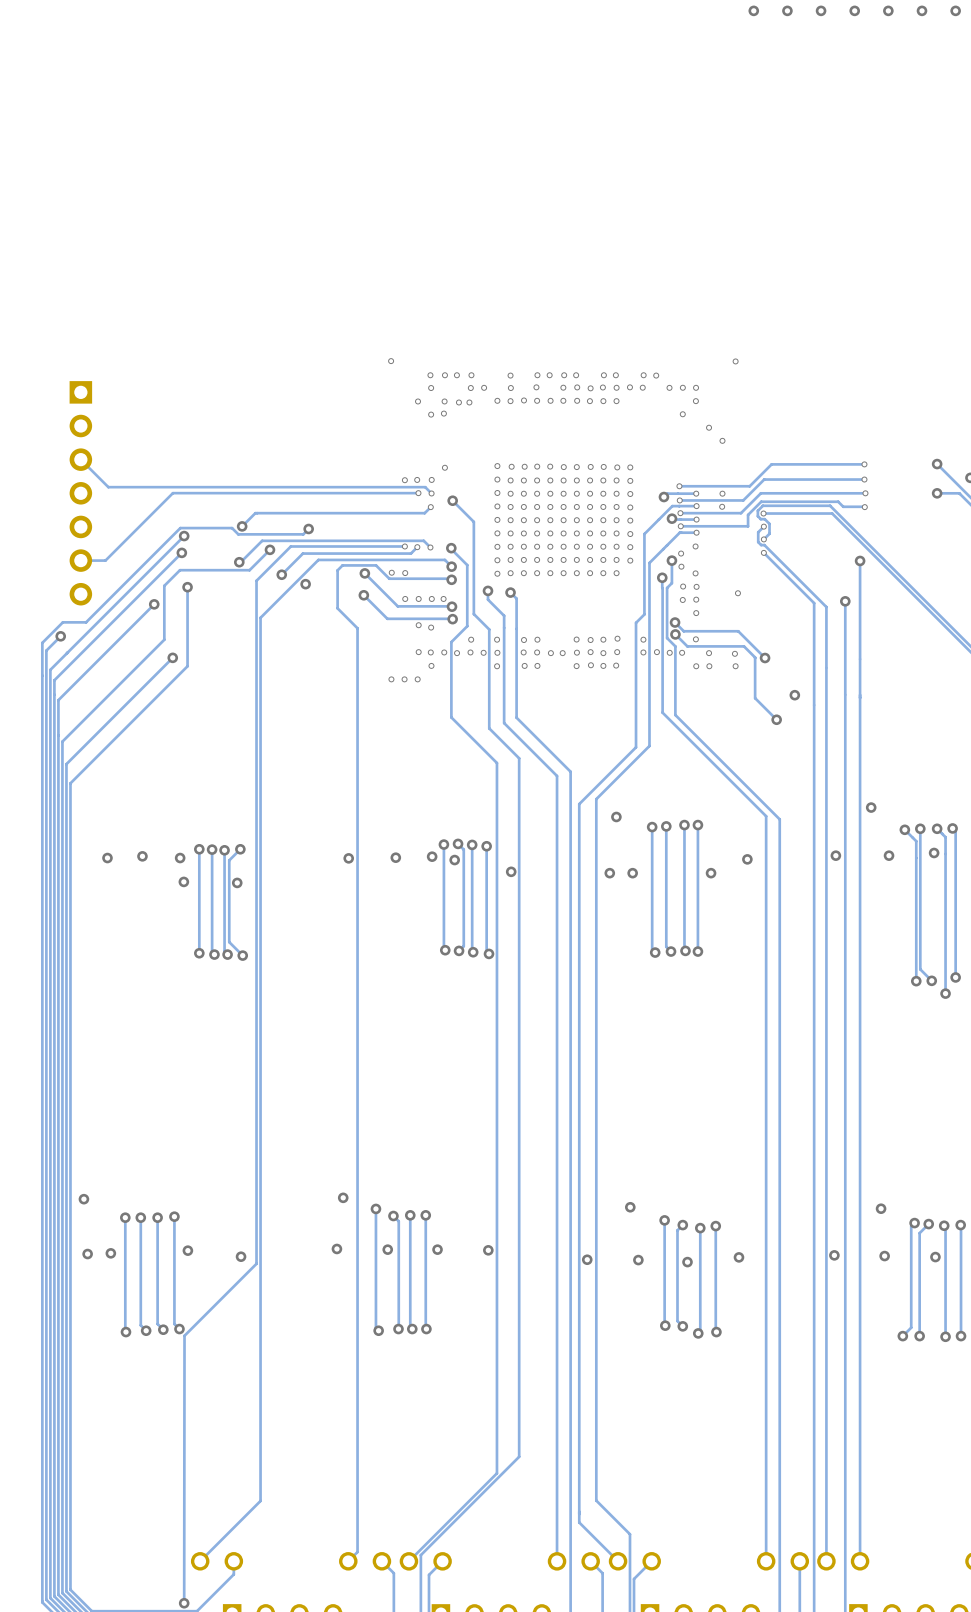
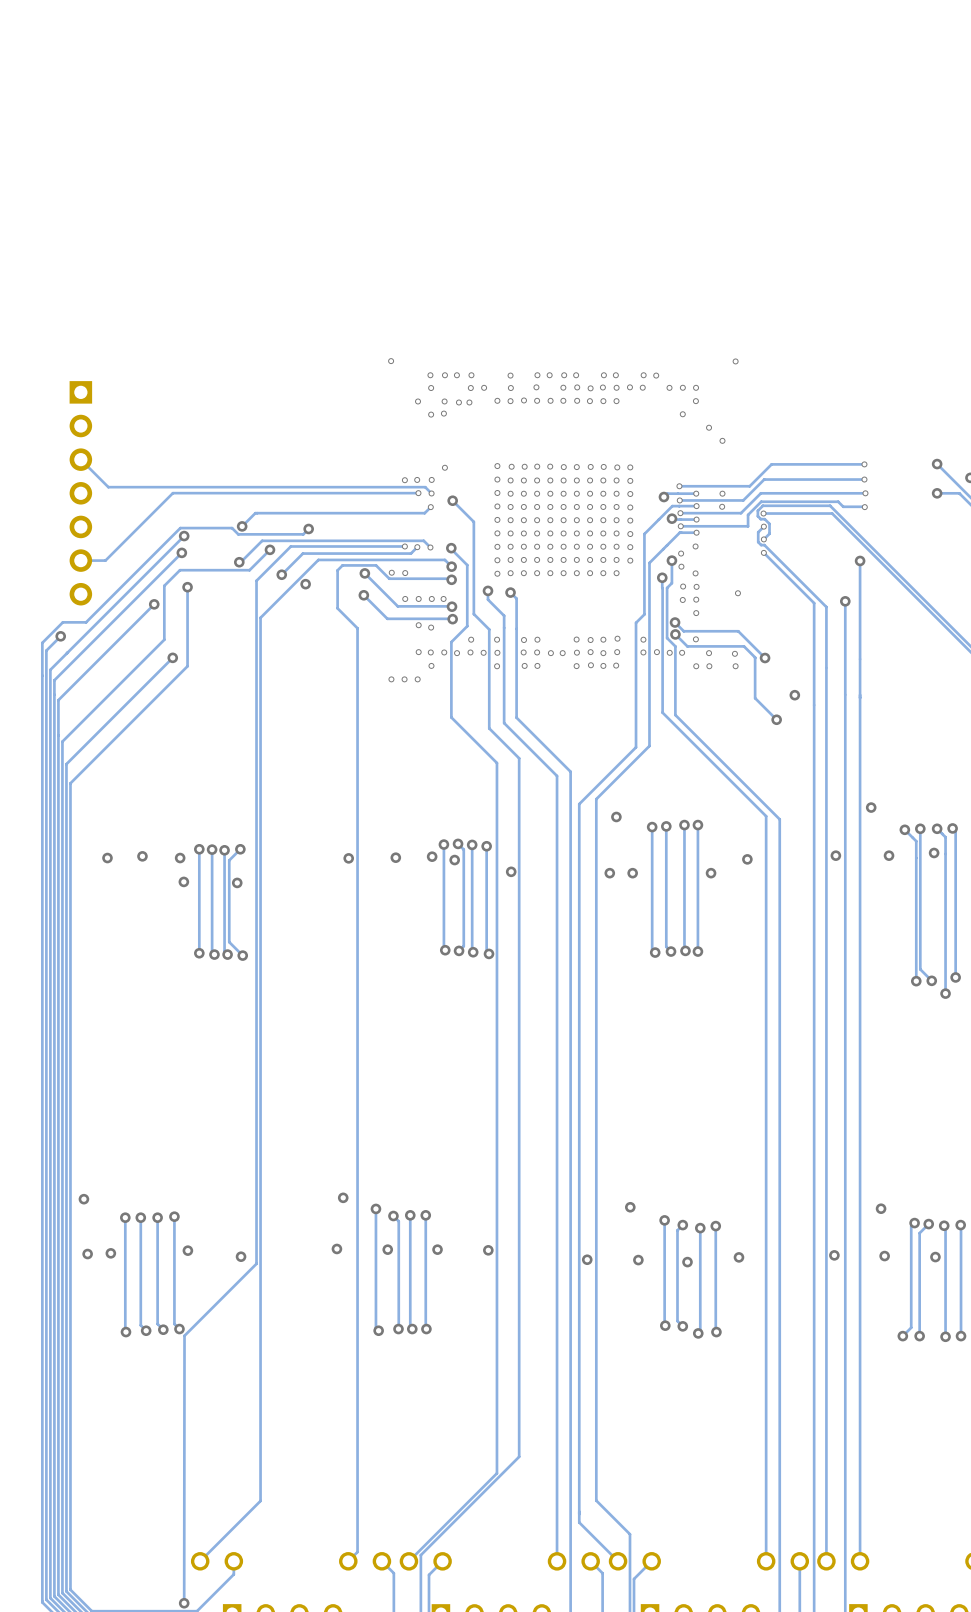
via: (753, 10) -> none
via: (787, 10) -> none
via: (821, 10) -> none
via: (854, 10) -> none
via: (888, 10) -> none
via: (922, 10) -> none
via: (955, 10) -> none

